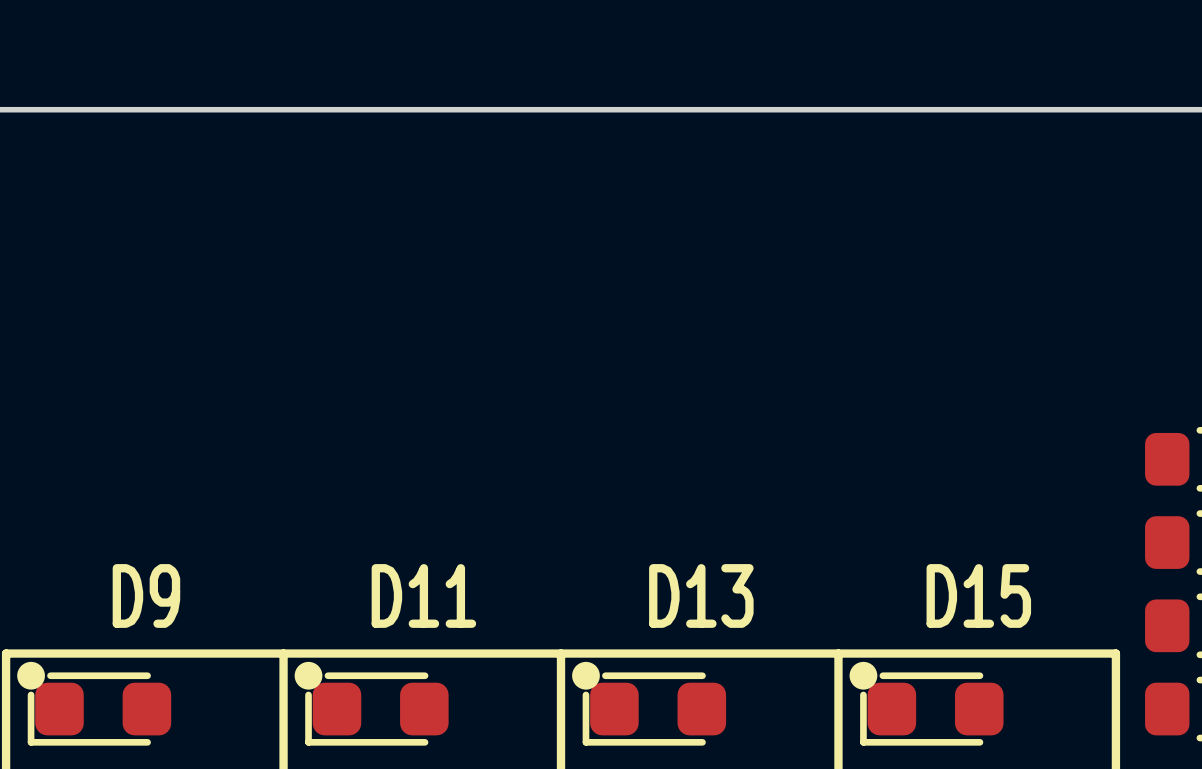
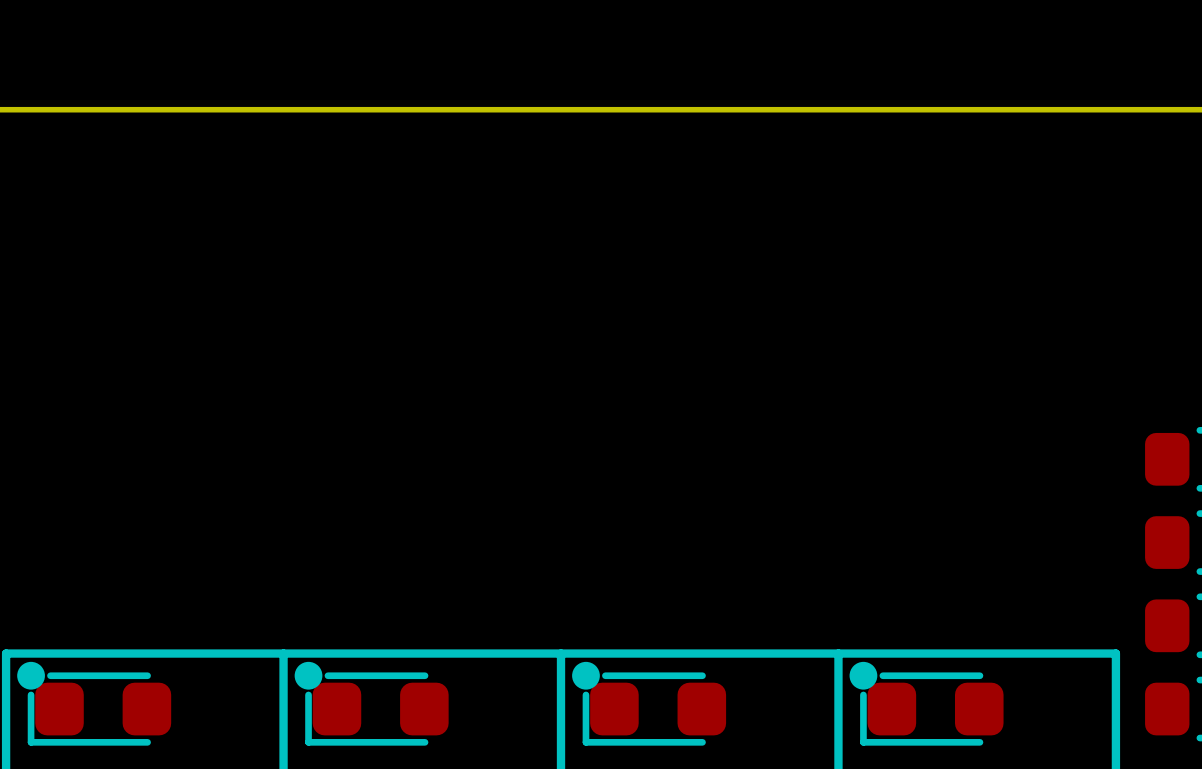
D9 name: D9 (146, 595) -> none
D11 name: D11 (423, 595) -> none
D13 name: D13 (701, 595) -> none
D15 name: D15 (978, 595) -> none

